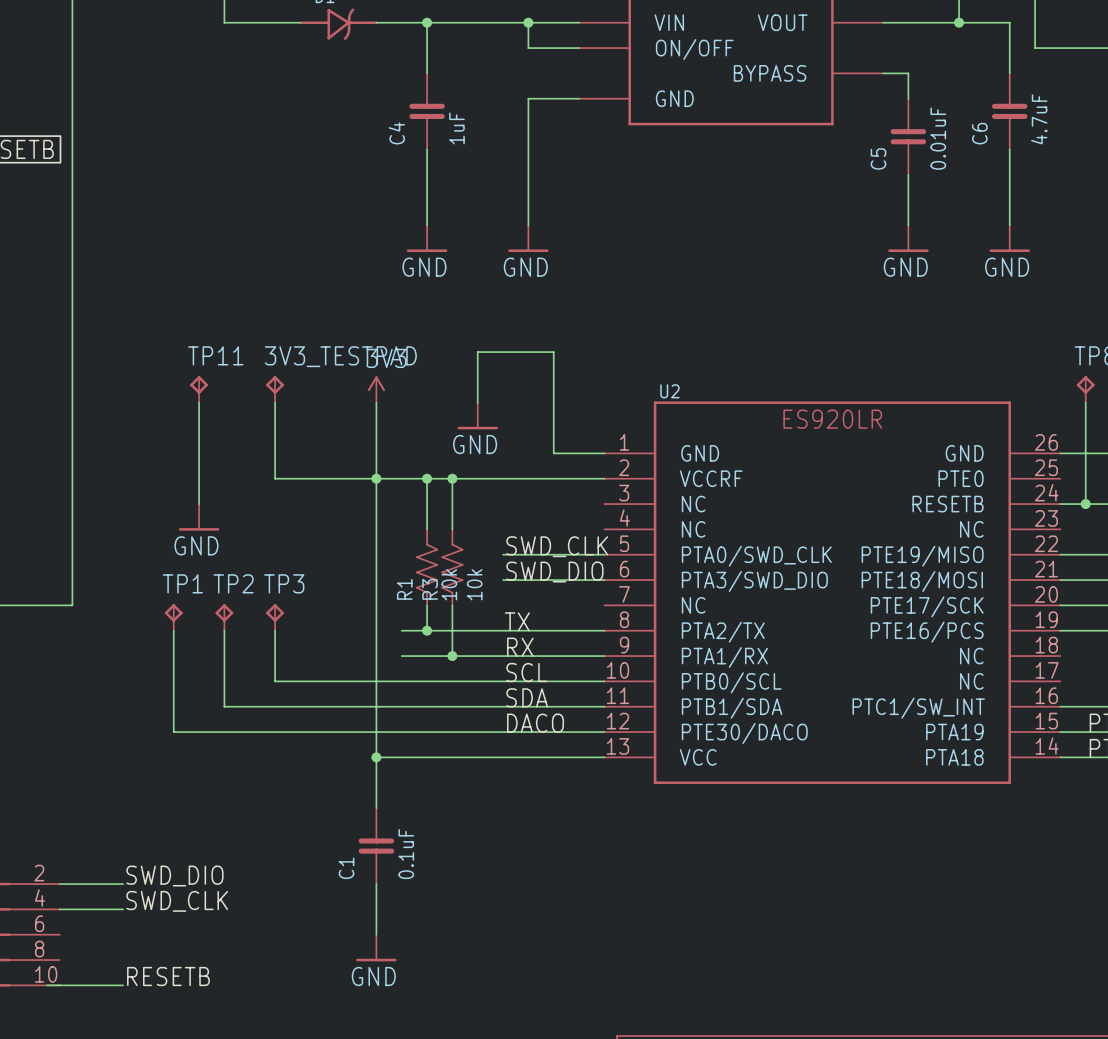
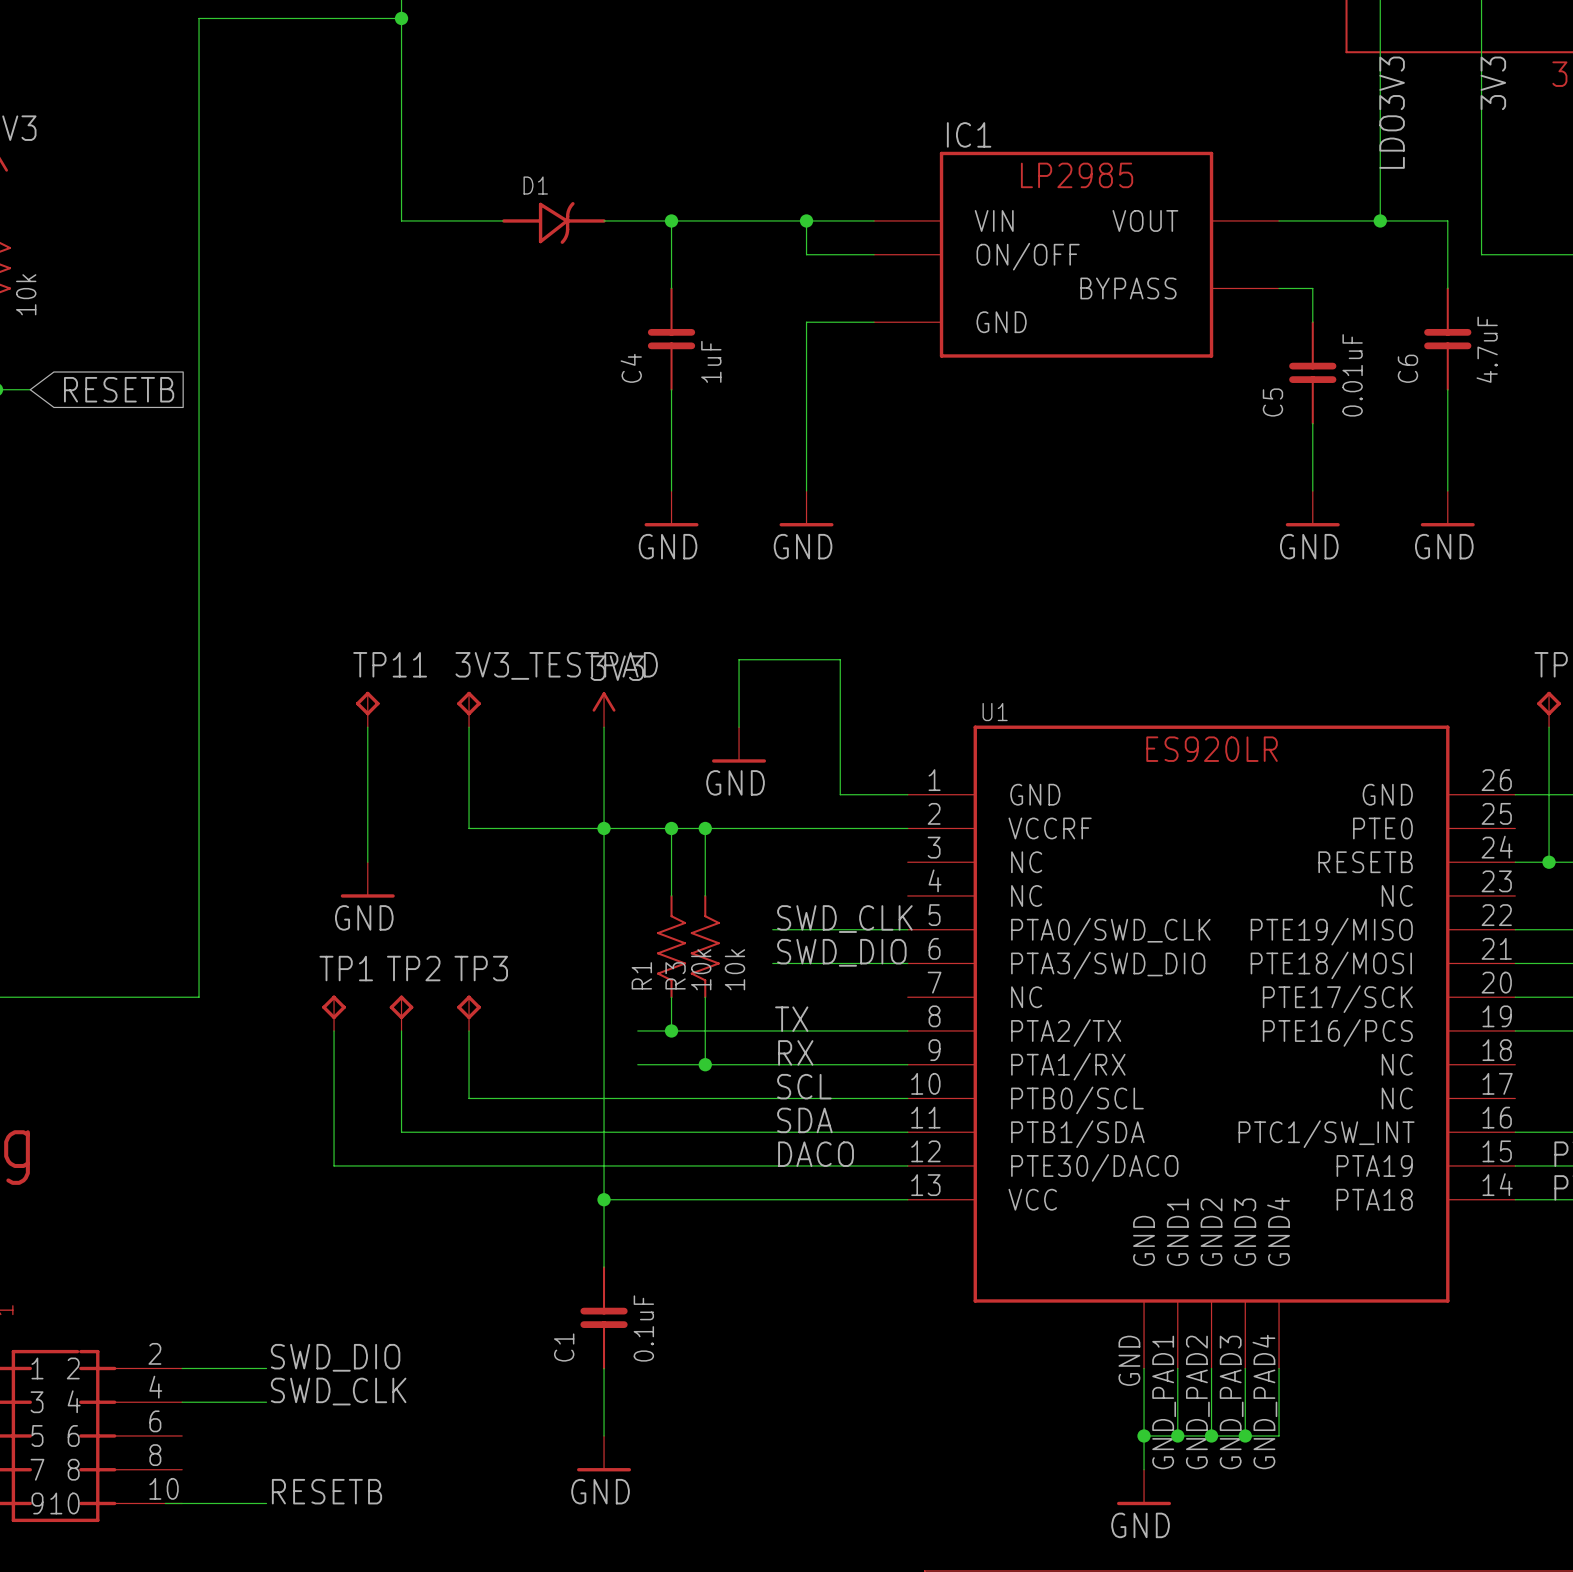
U2: (832, 592) -> none
U1: none -> (1211, 1047)
wire: none -> (1144, 1368) (1144, 1469)
wire: none -> (1177, 1368) (1177, 1435)
wire: none -> (1211, 1368) (1211, 1435)
wire: none -> (1245, 1368) (1245, 1435)
wire: none -> (1279, 1368) (1279, 1435) (1144, 1435)
junction: none -> (1144, 1435)
junction: none -> (1177, 1435)
junction: none -> (1211, 1435)
junction: none -> (1245, 1435)
power symbol: none -> GND (1144, 1487)

